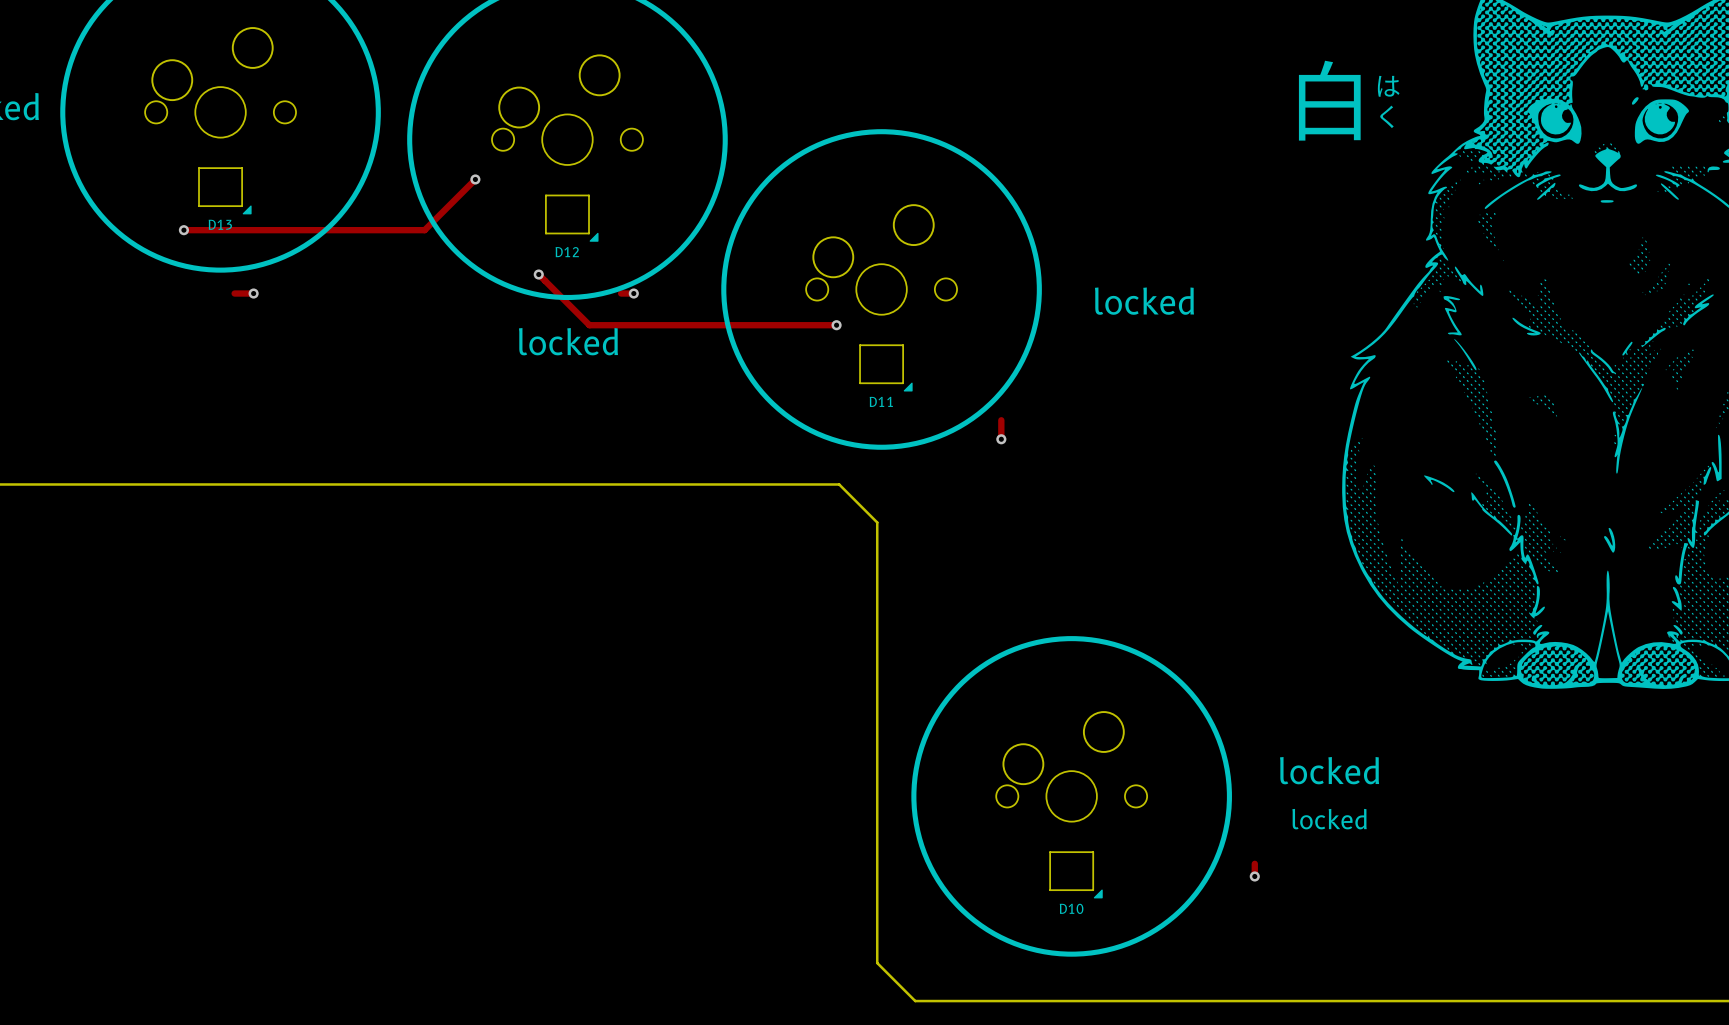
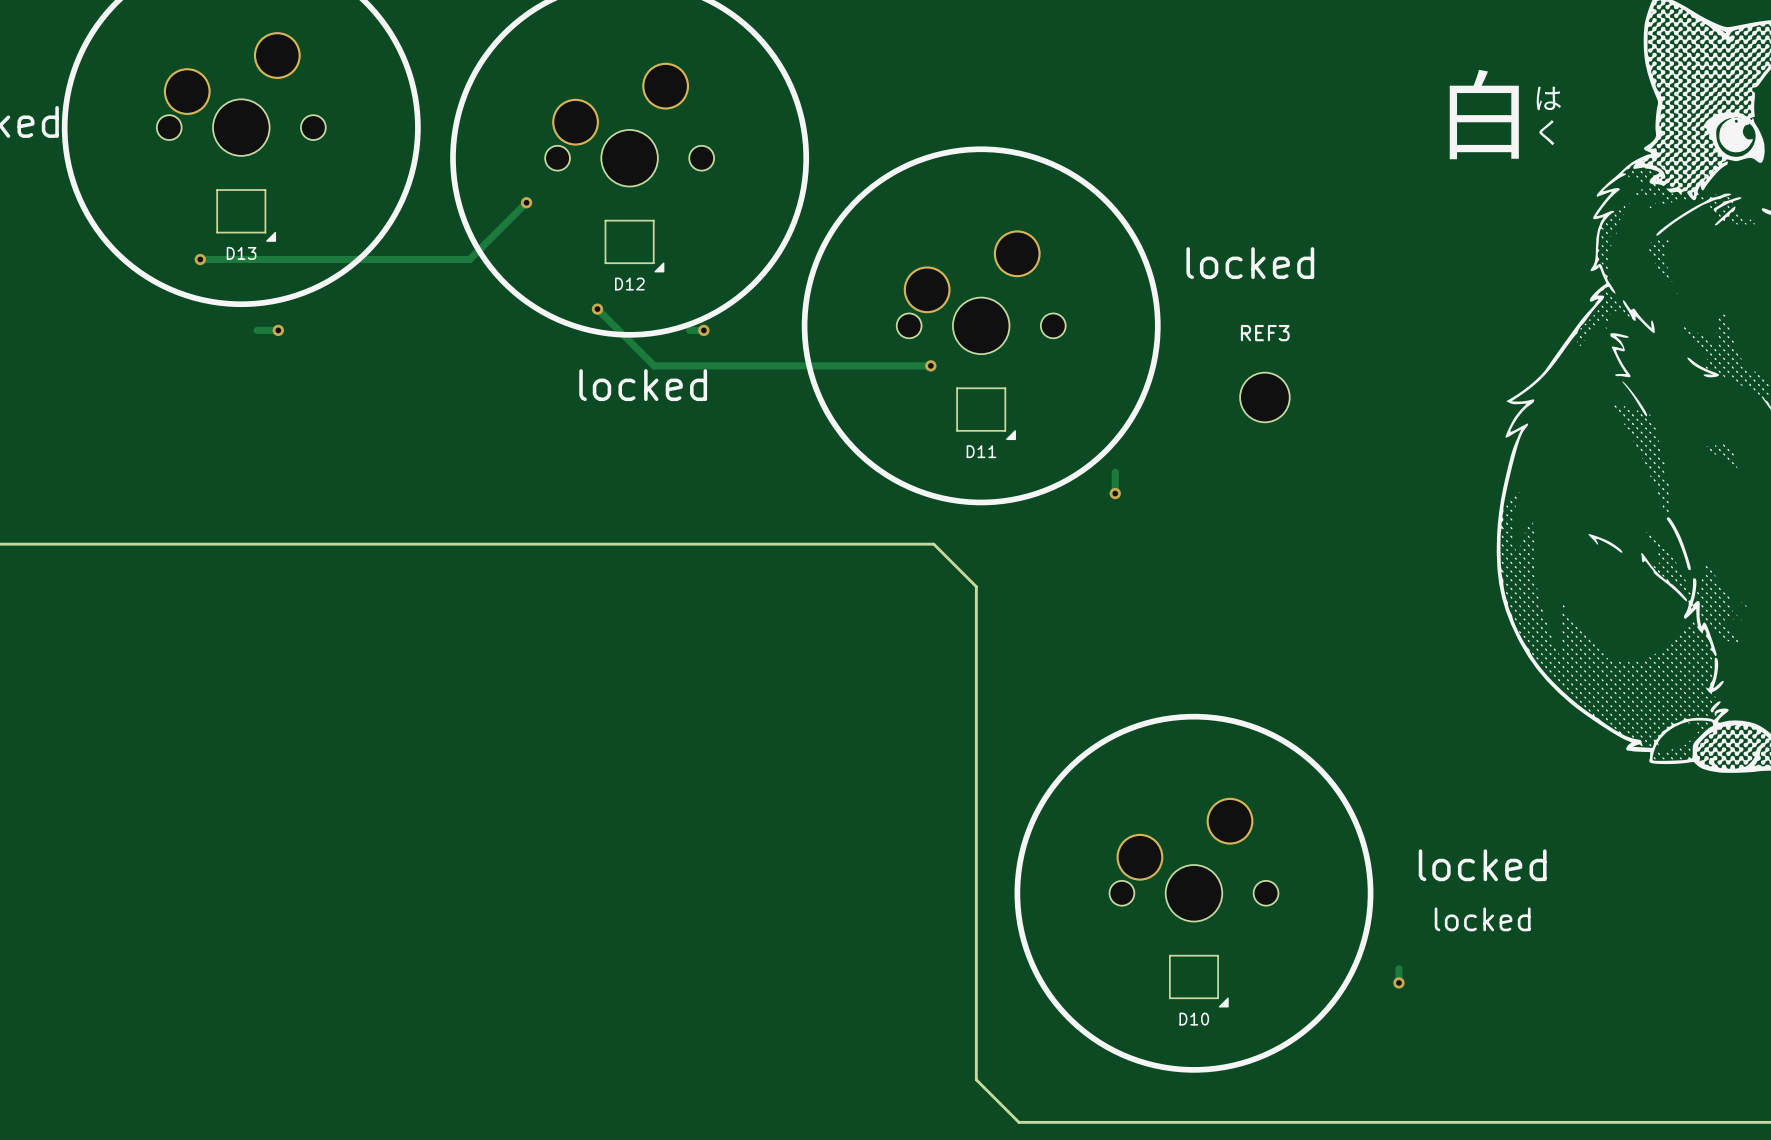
text position: locked (1144, 301) -> locked (1250, 263)
REF3: none -> (1264, 397)

